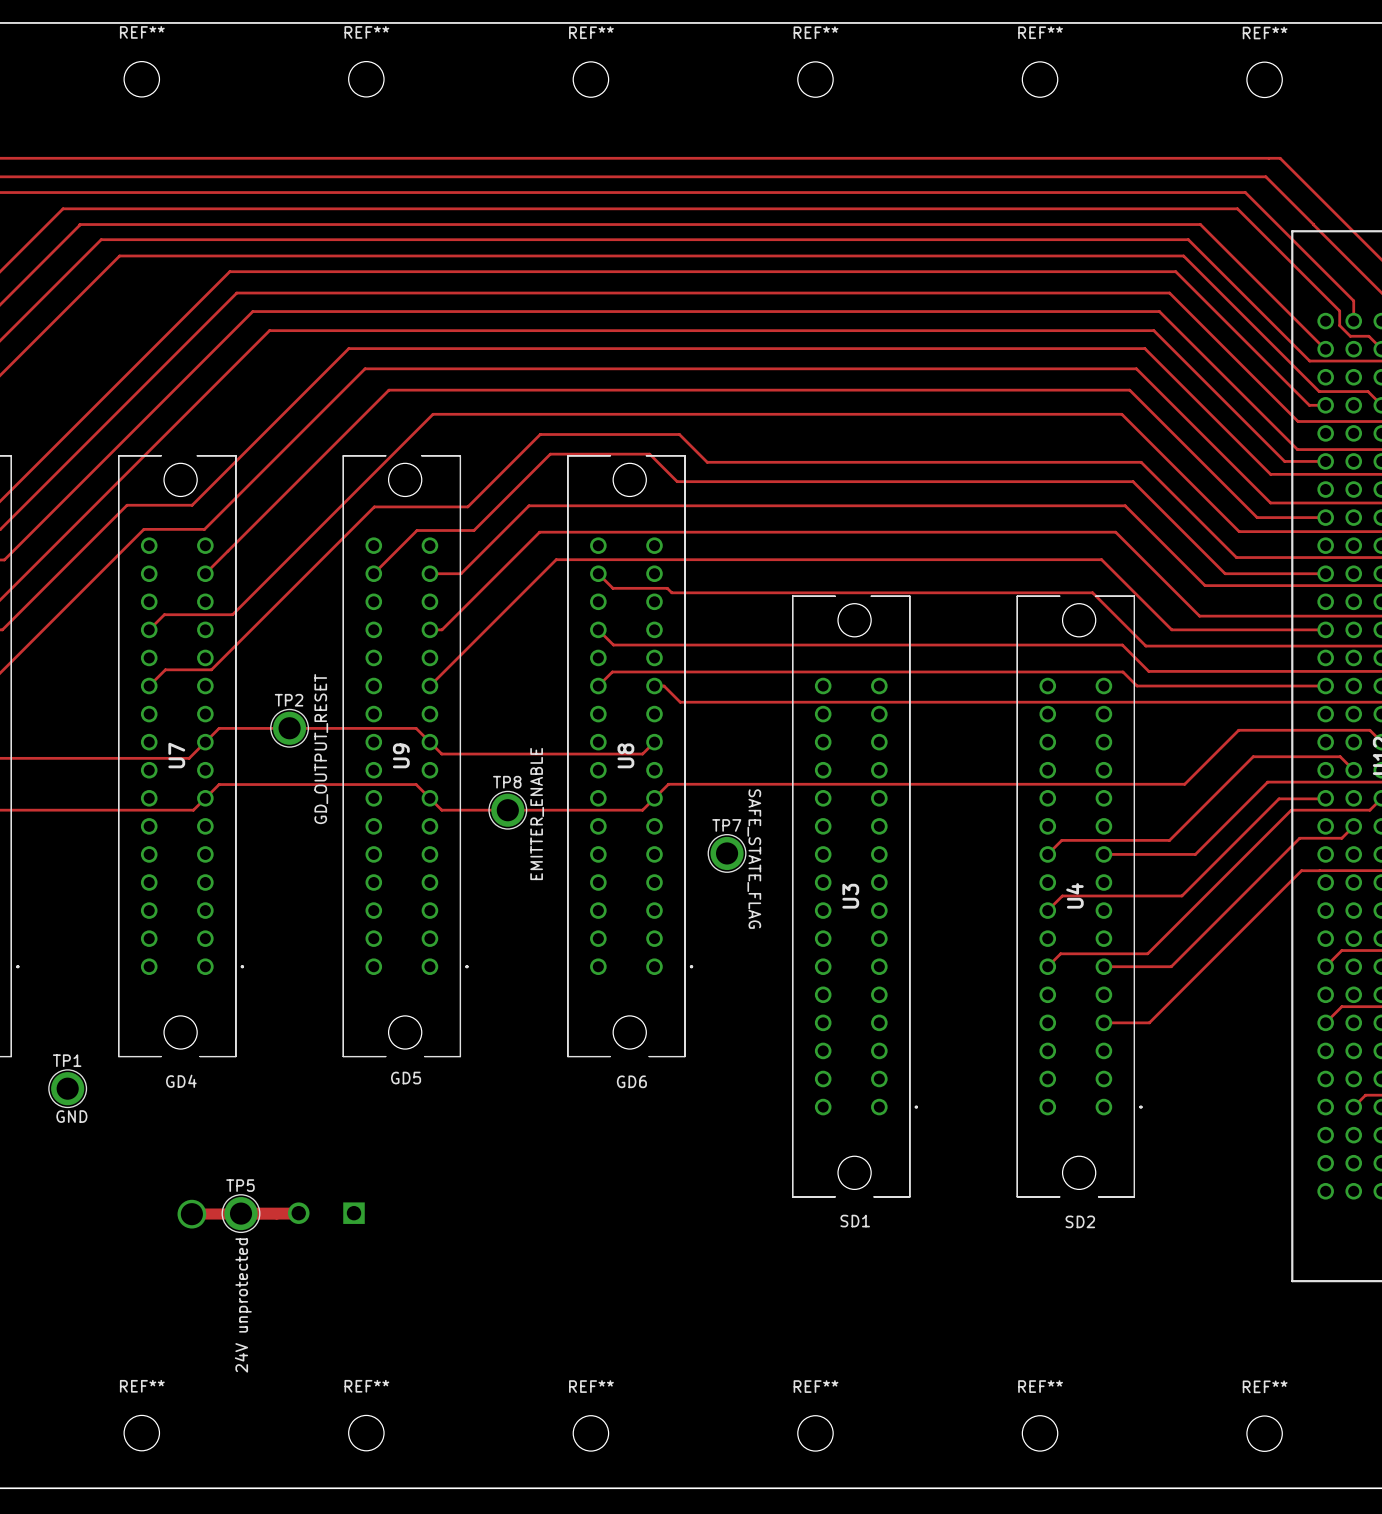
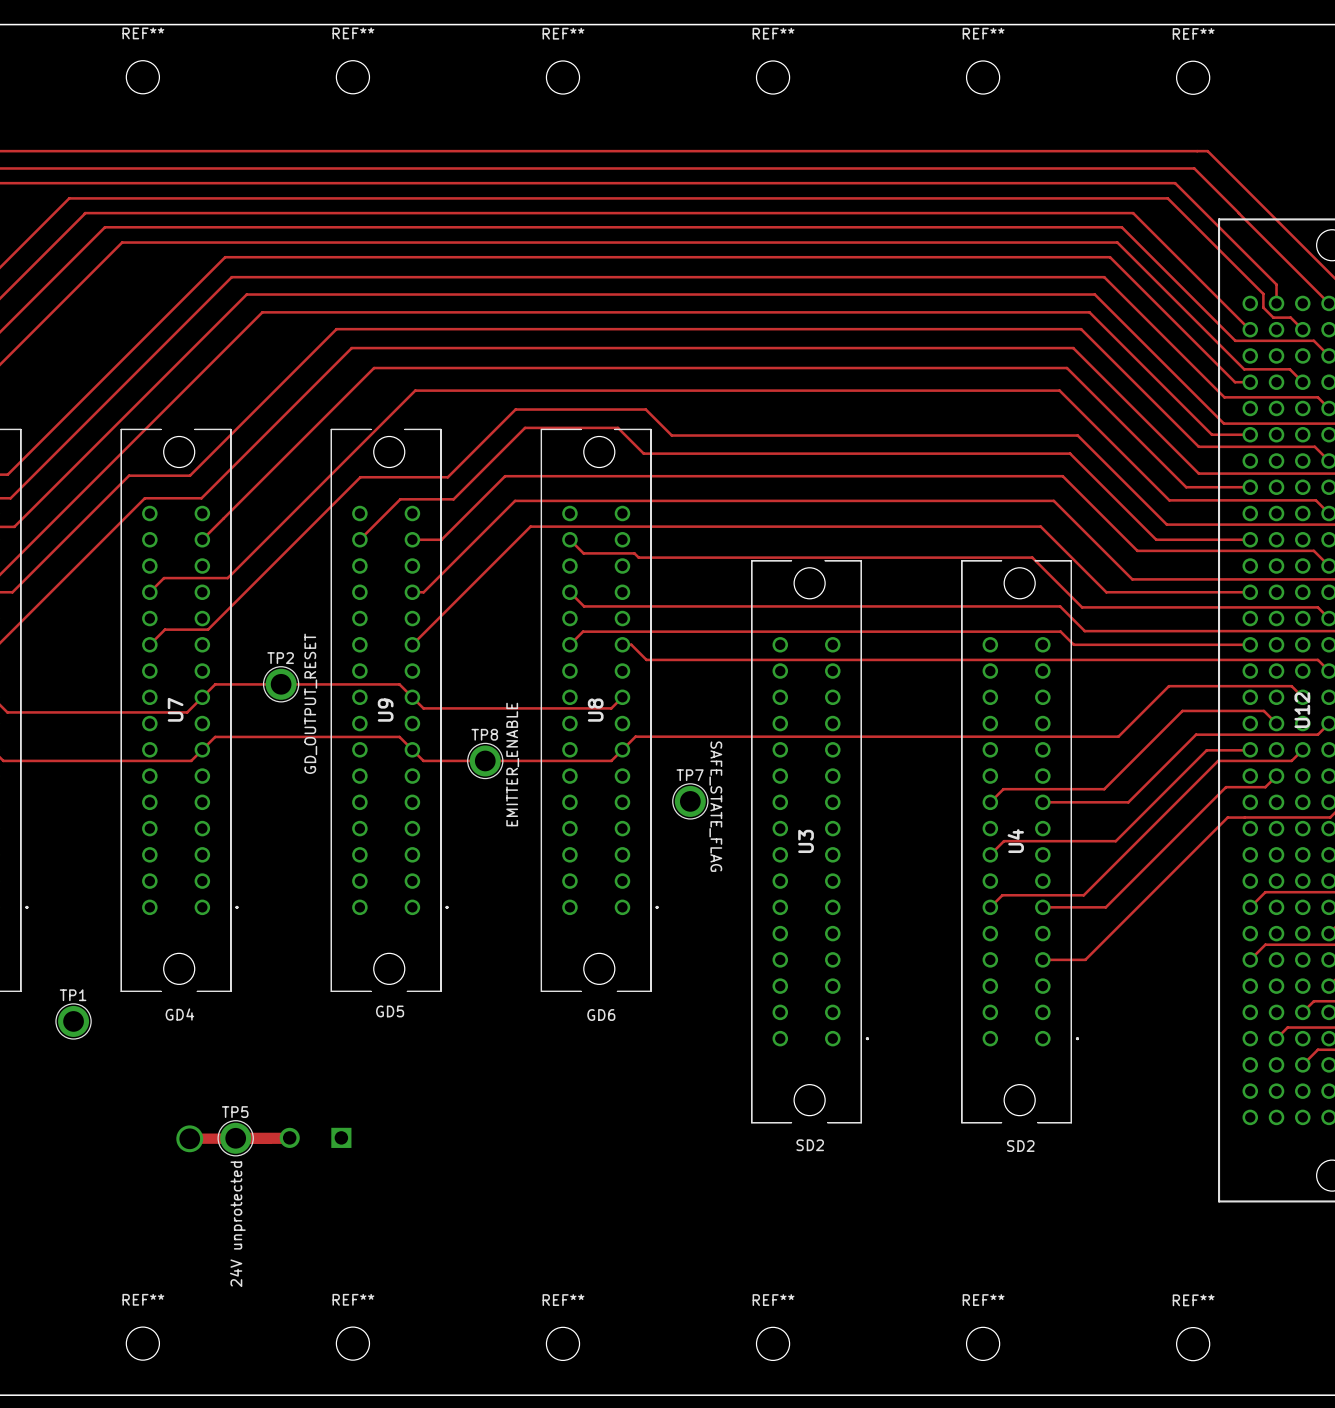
text: GND (71, 1116) -> none
text: SD1 (855, 1221) -> SD2 (810, 1145)

